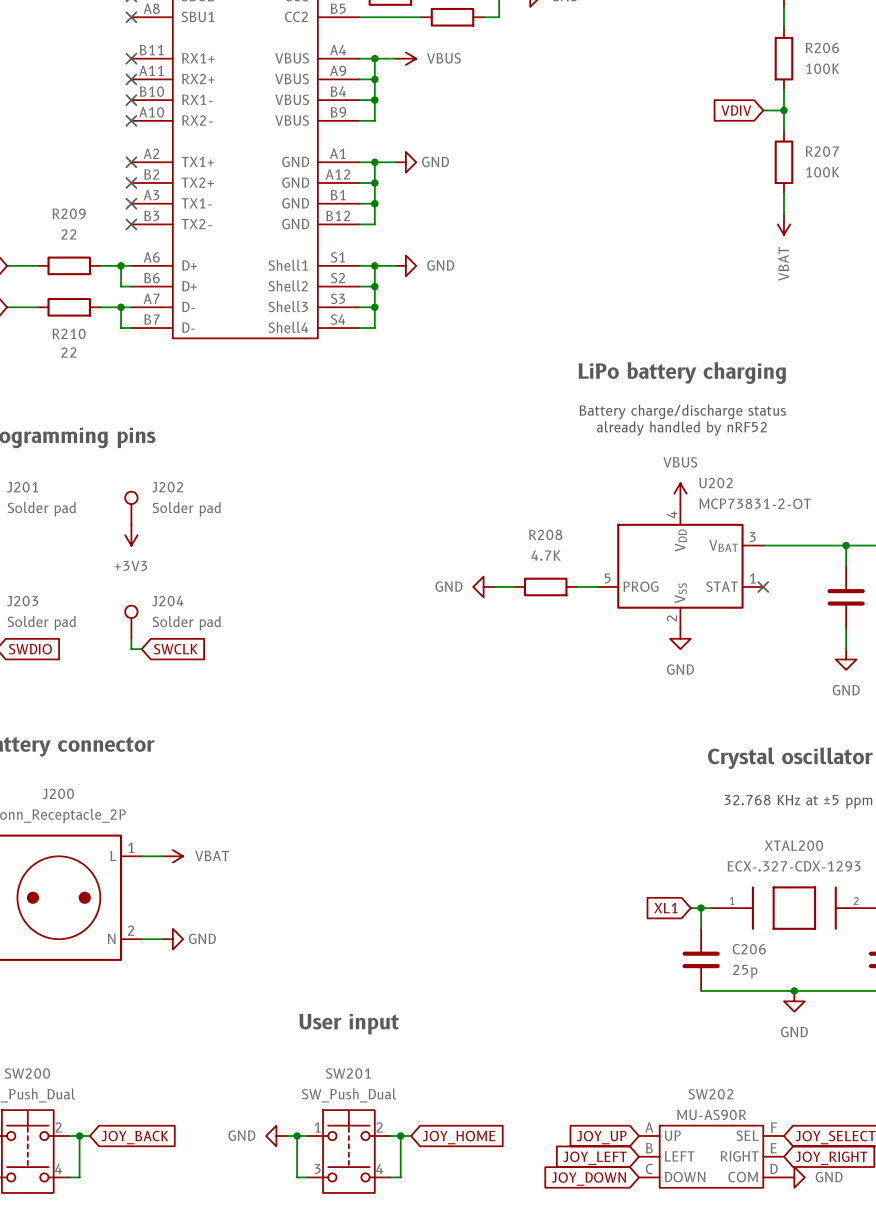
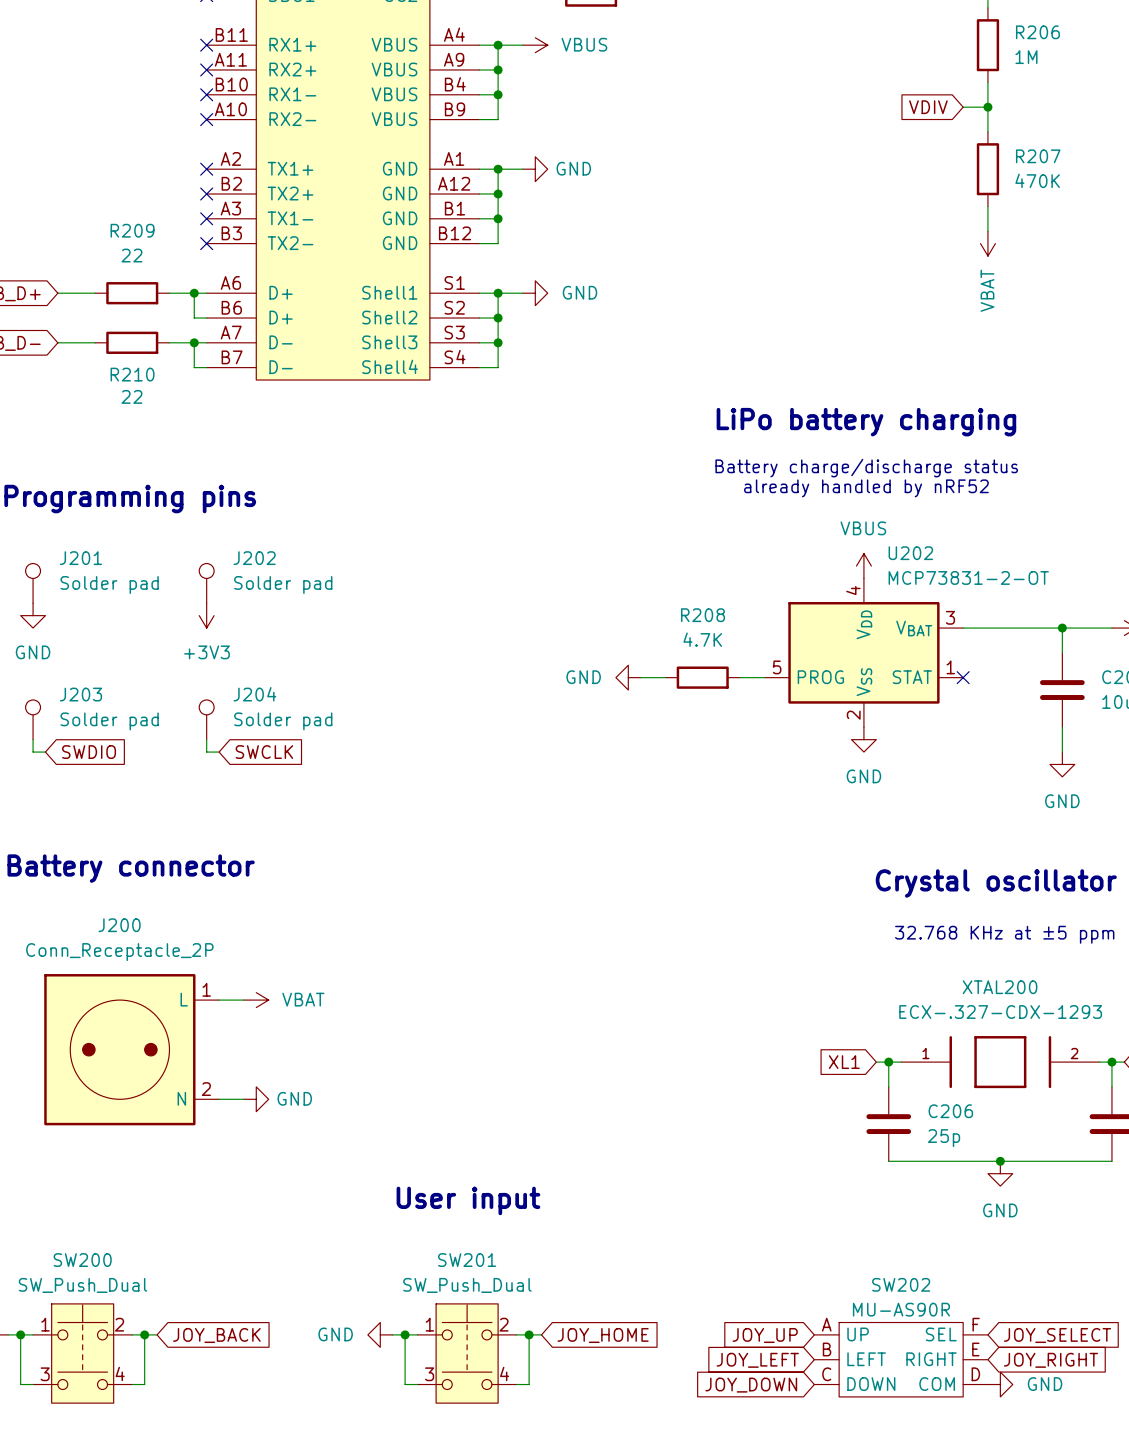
R206 value: 100K (822, 68) -> 1M (1026, 57)
R207 value: 100K (822, 172) -> 470K (1037, 180)

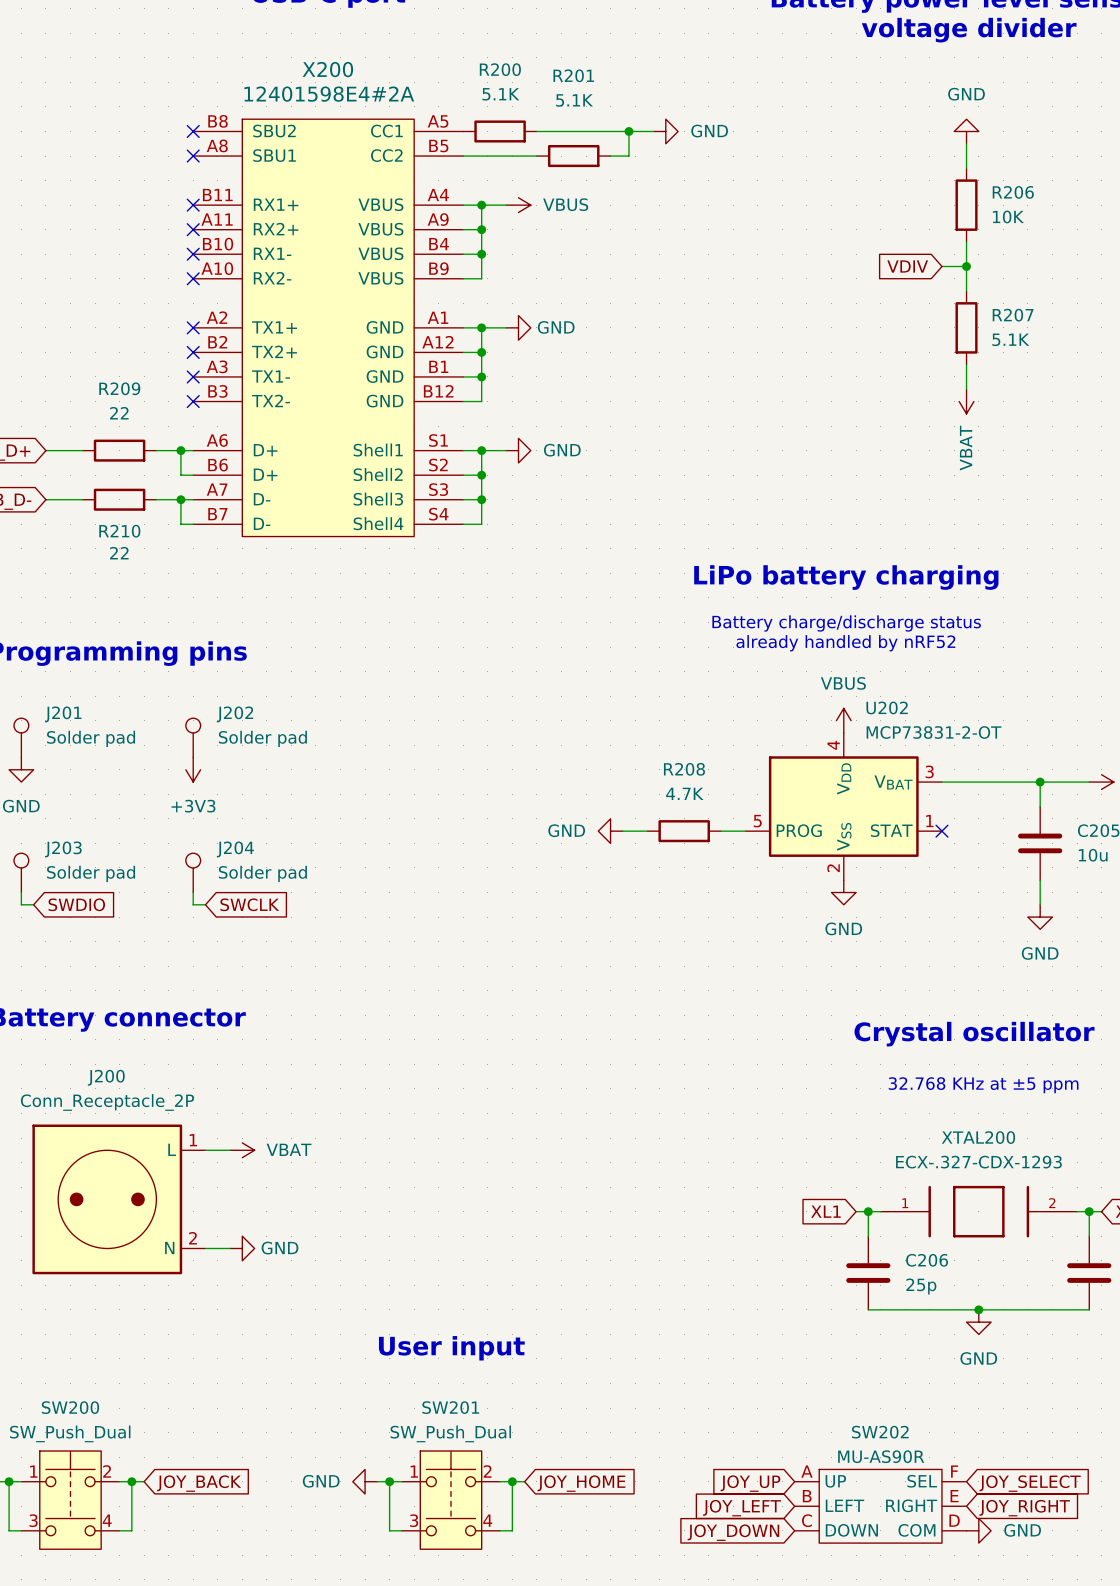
R206 value: 1M (1026, 57) -> 10K (1008, 216)
R207 value: 470K (1037, 180) -> 5.1K (1010, 339)

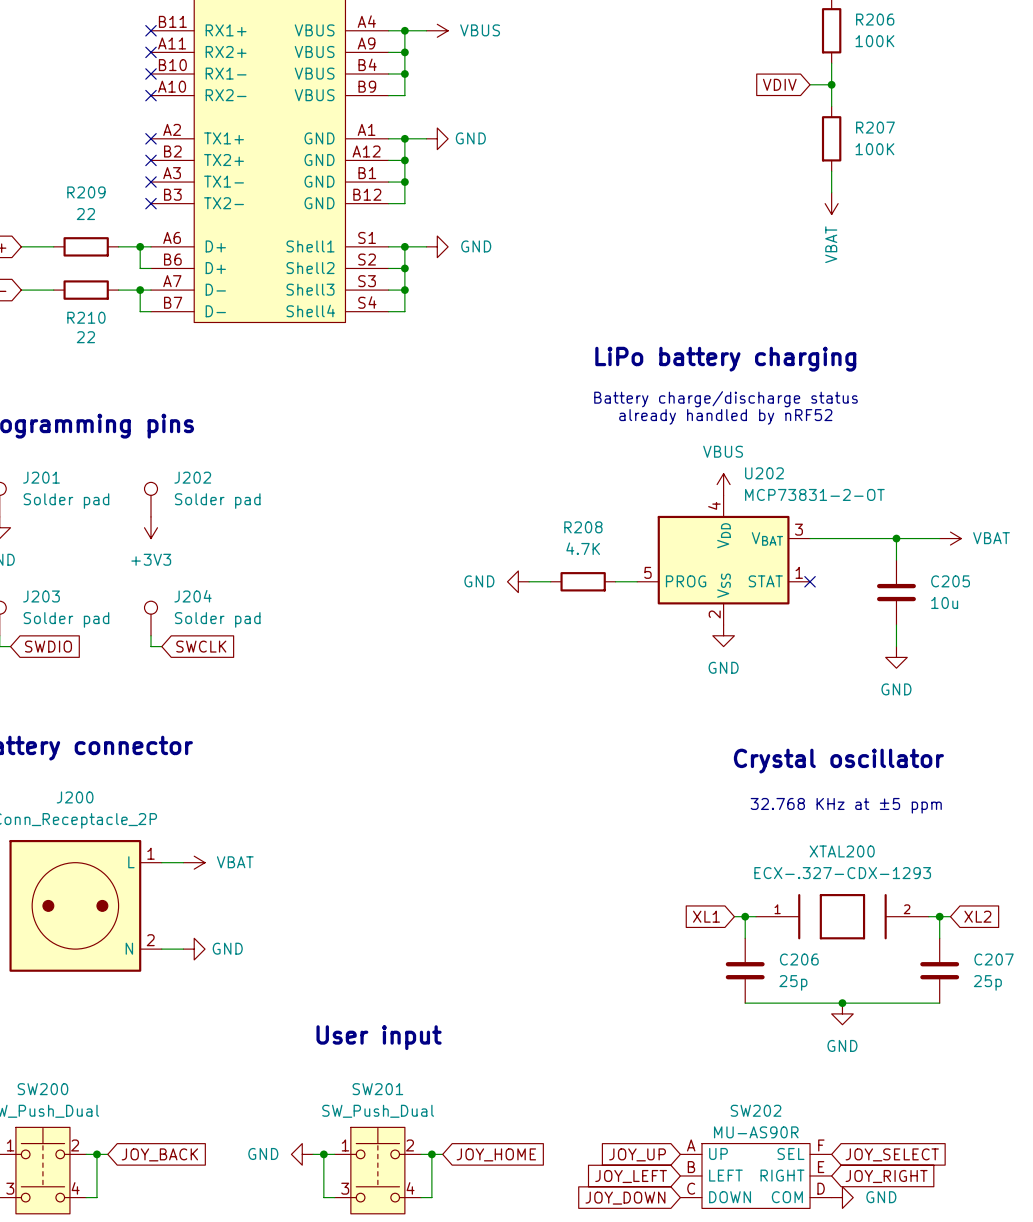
R206 value: 10K (1008, 216) -> 100K (874, 41)
R207 value: 5.1K (1010, 339) -> 100K (874, 149)

